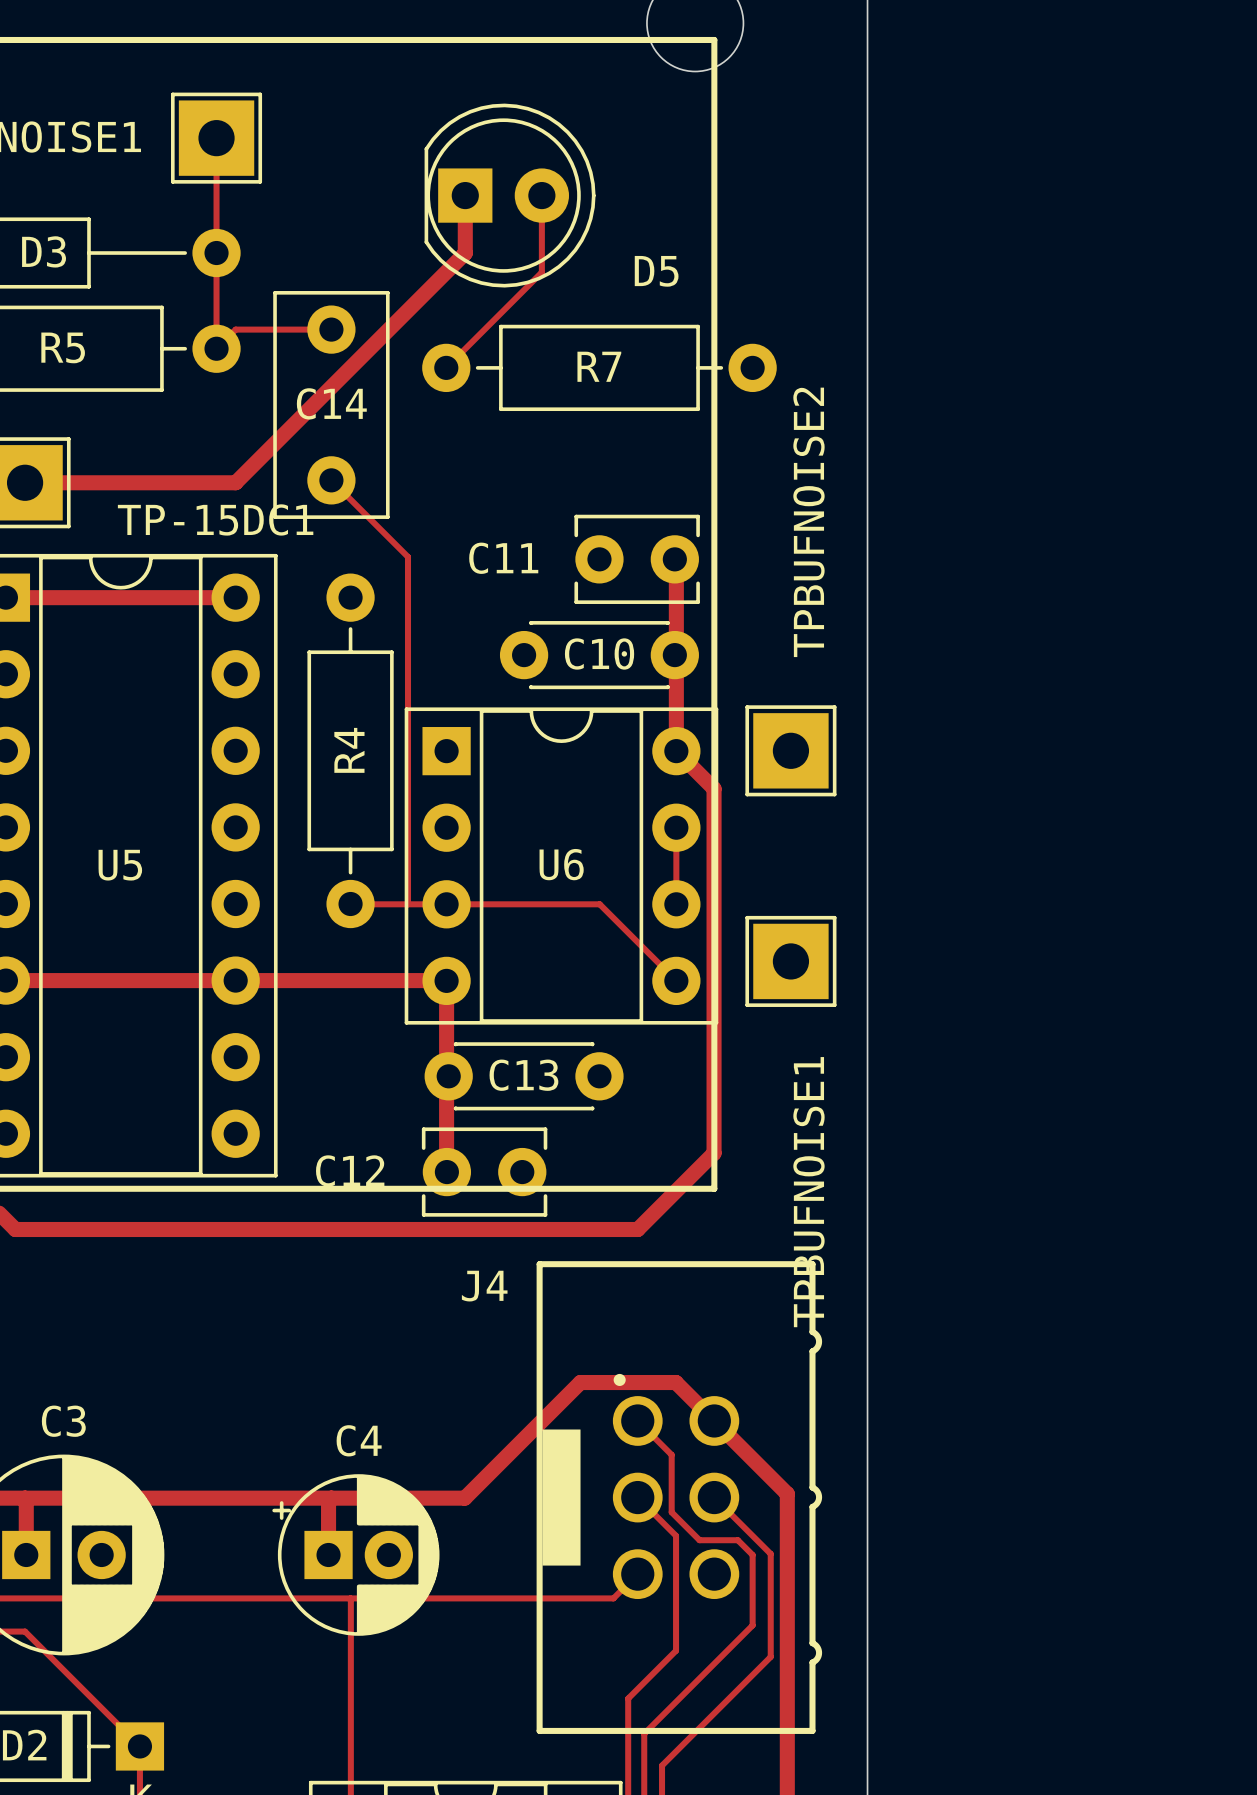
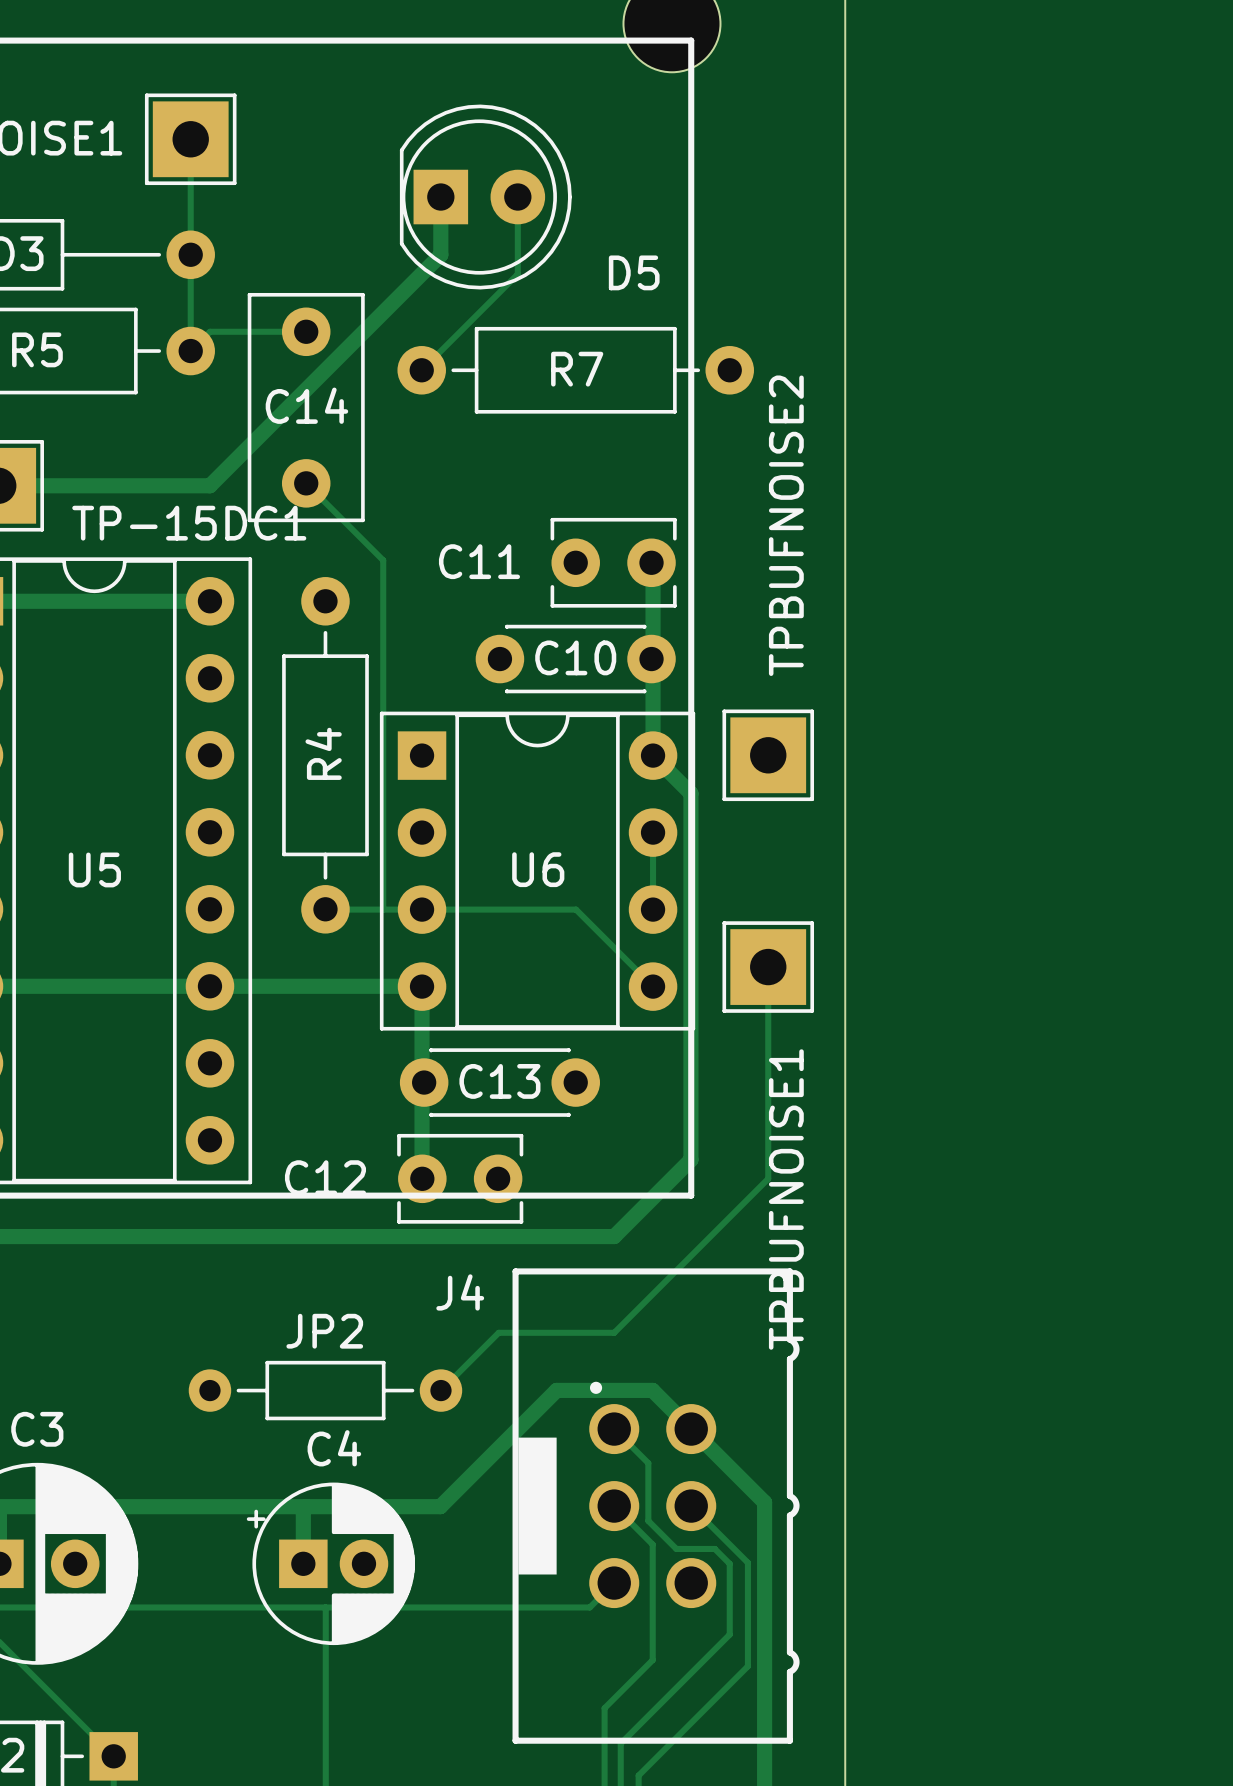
track: none -> (768, 967) (768, 1178) (614, 1332) (498, 1332) (440, 1390)
JP2: none -> (325, 1390)

